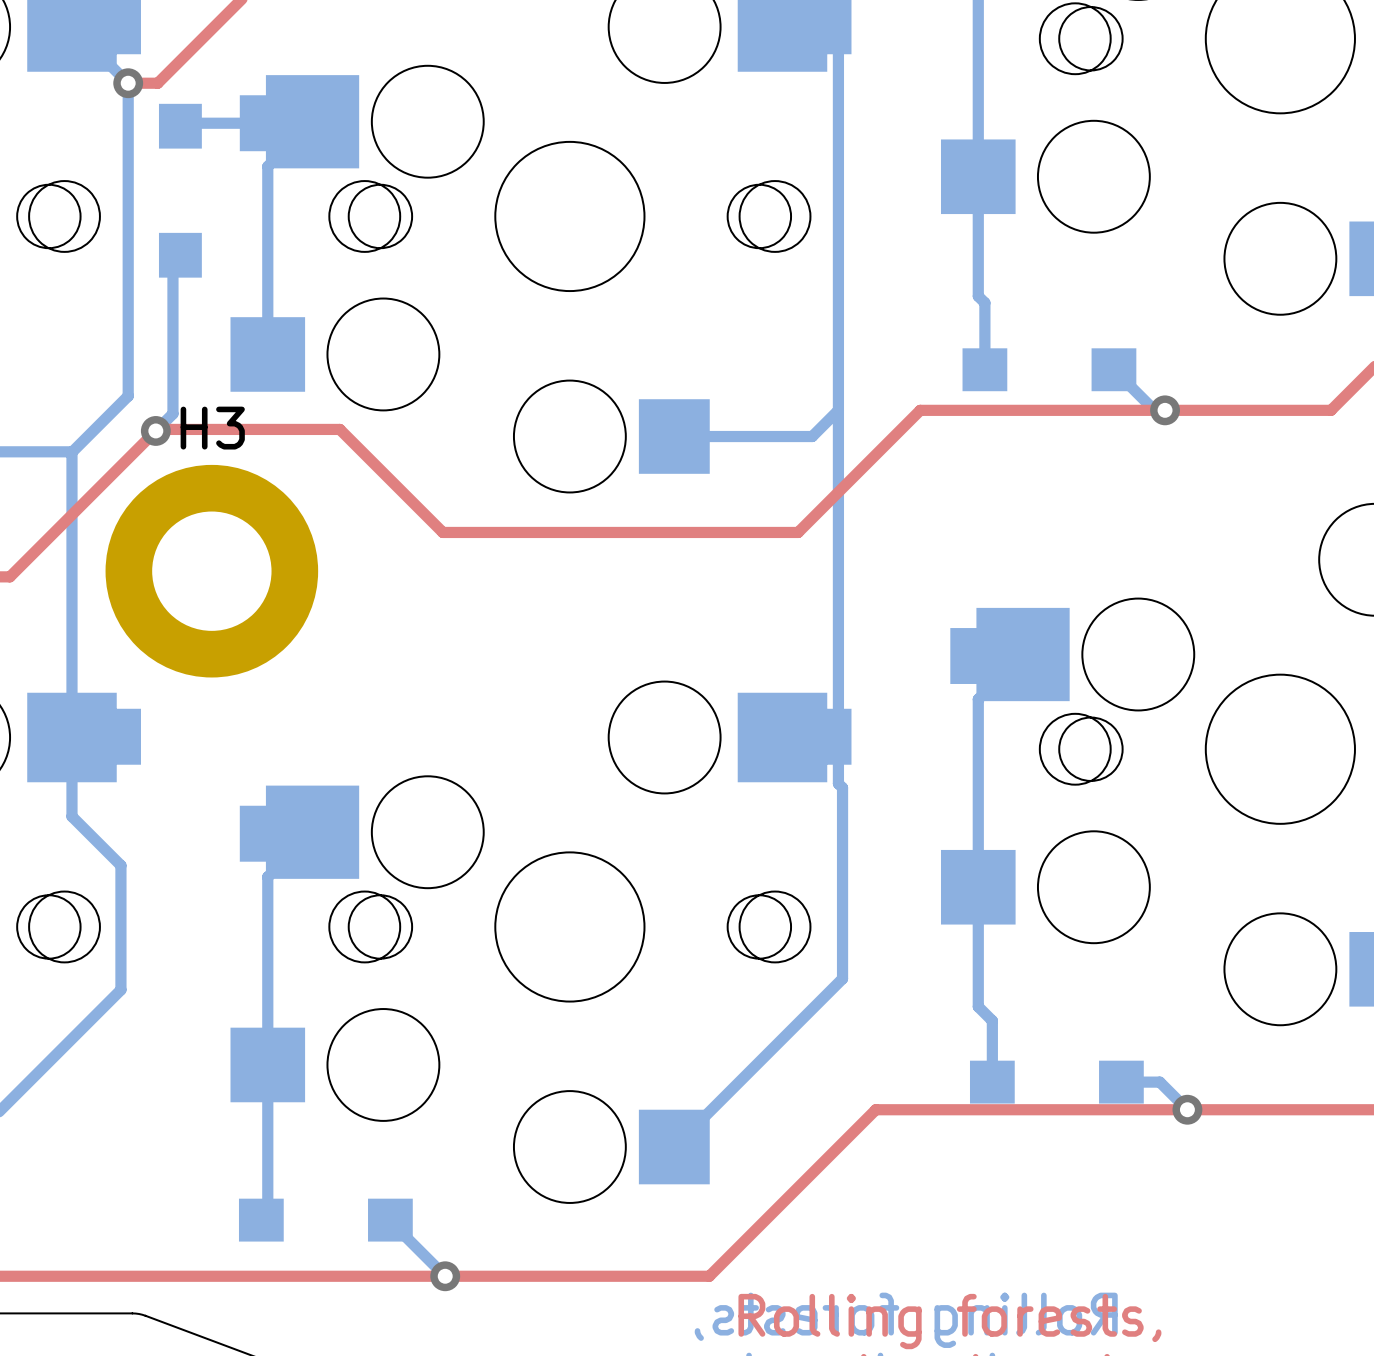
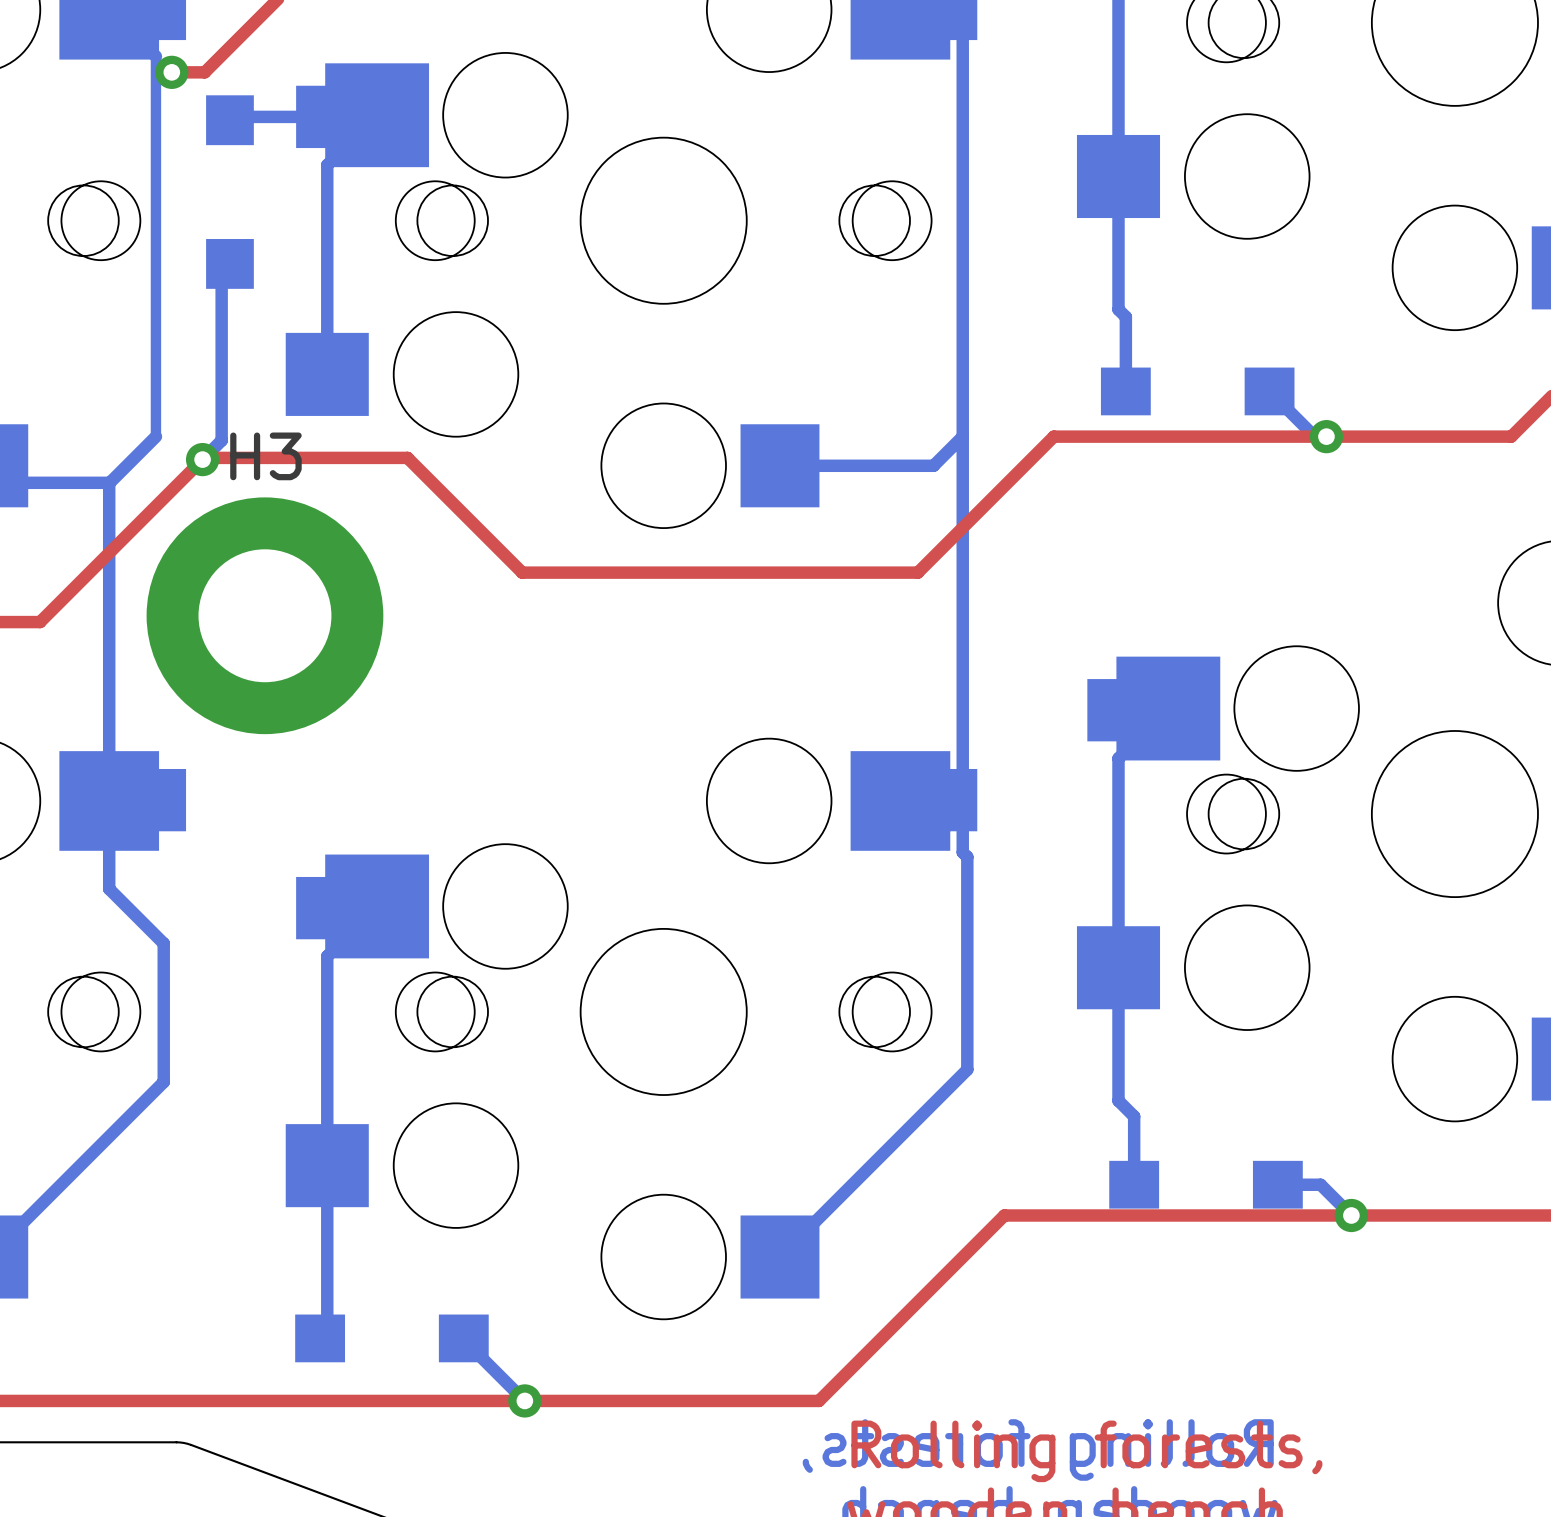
bottom track: (113, 68) (128, 83) (128, 396) (113, 410) -> (155, 56) (155, 436)

